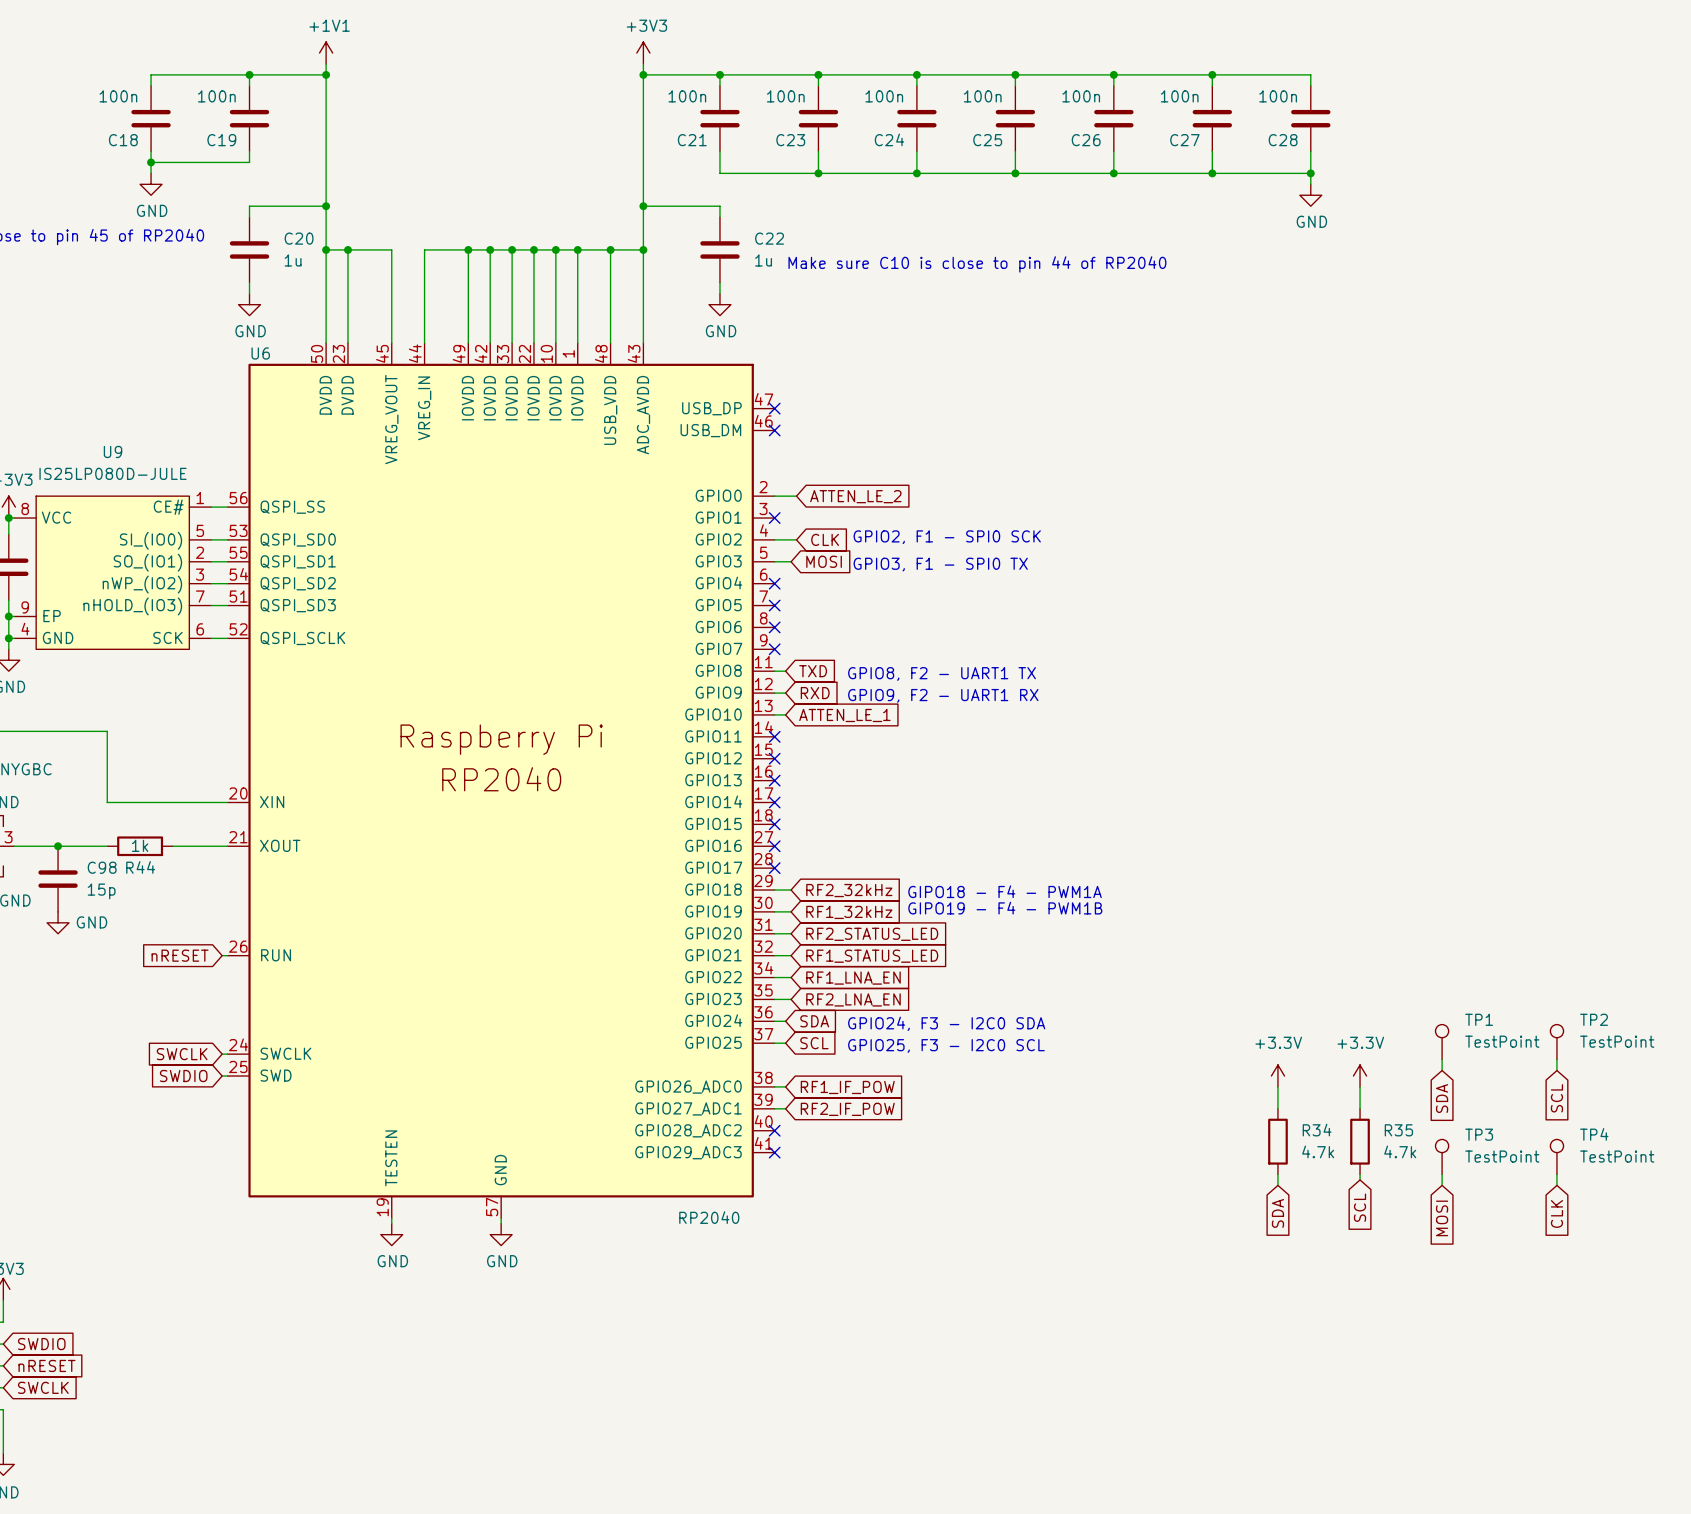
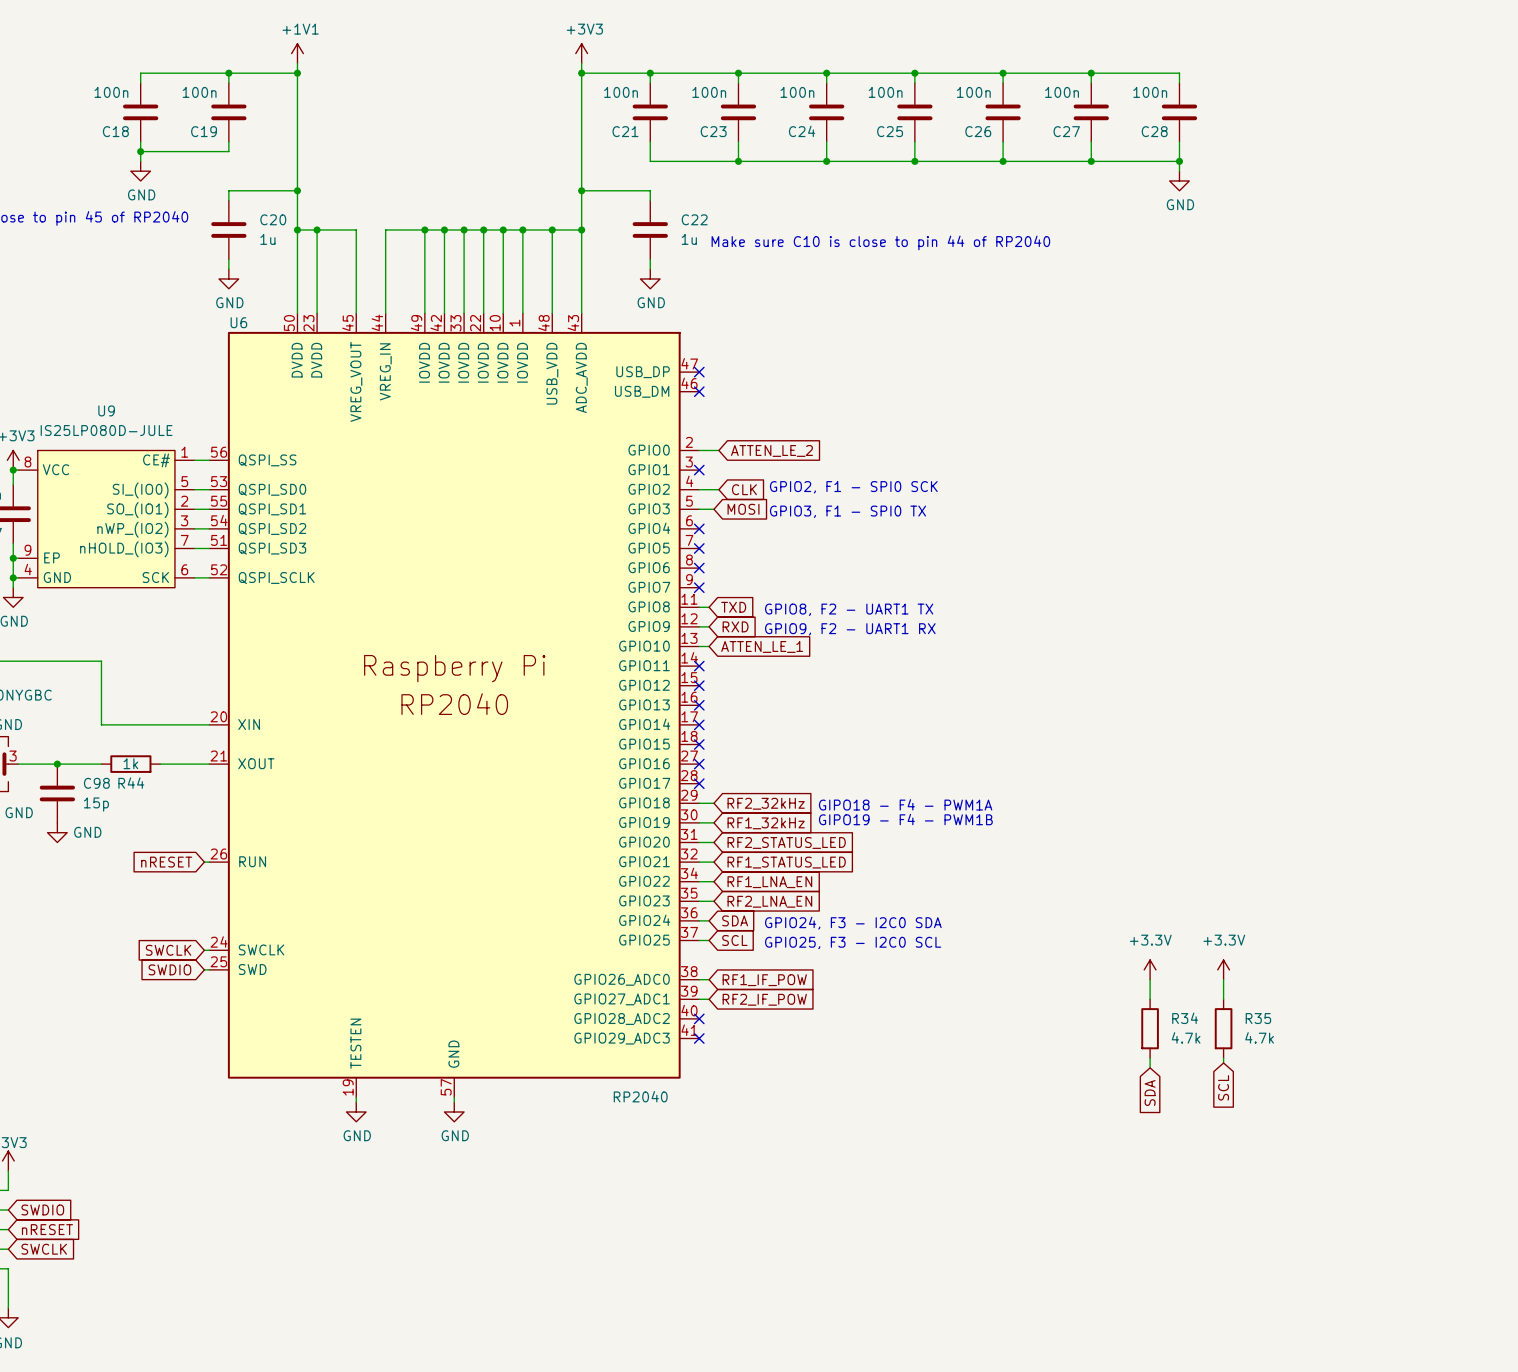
TP1: TestPoint (1442, 1042) -> none
TP2: TestPoint (1556, 1042) -> none
wire: (1442, 1059) (1442, 1070) -> none
wire: (1556, 1059) (1556, 1070) -> none
global label: SDA (1442, 1098) -> none
global label: SCL (1556, 1098) -> none
TP3: TestPoint (1442, 1156) -> none
TP4: TestPoint (1556, 1156) -> none
wire: (1442, 1174) (1442, 1185) -> none
wire: (1556, 1174) (1556, 1185) -> none
global label: CLK (1556, 1213) -> none
global label: MOSI (1442, 1218) -> none

